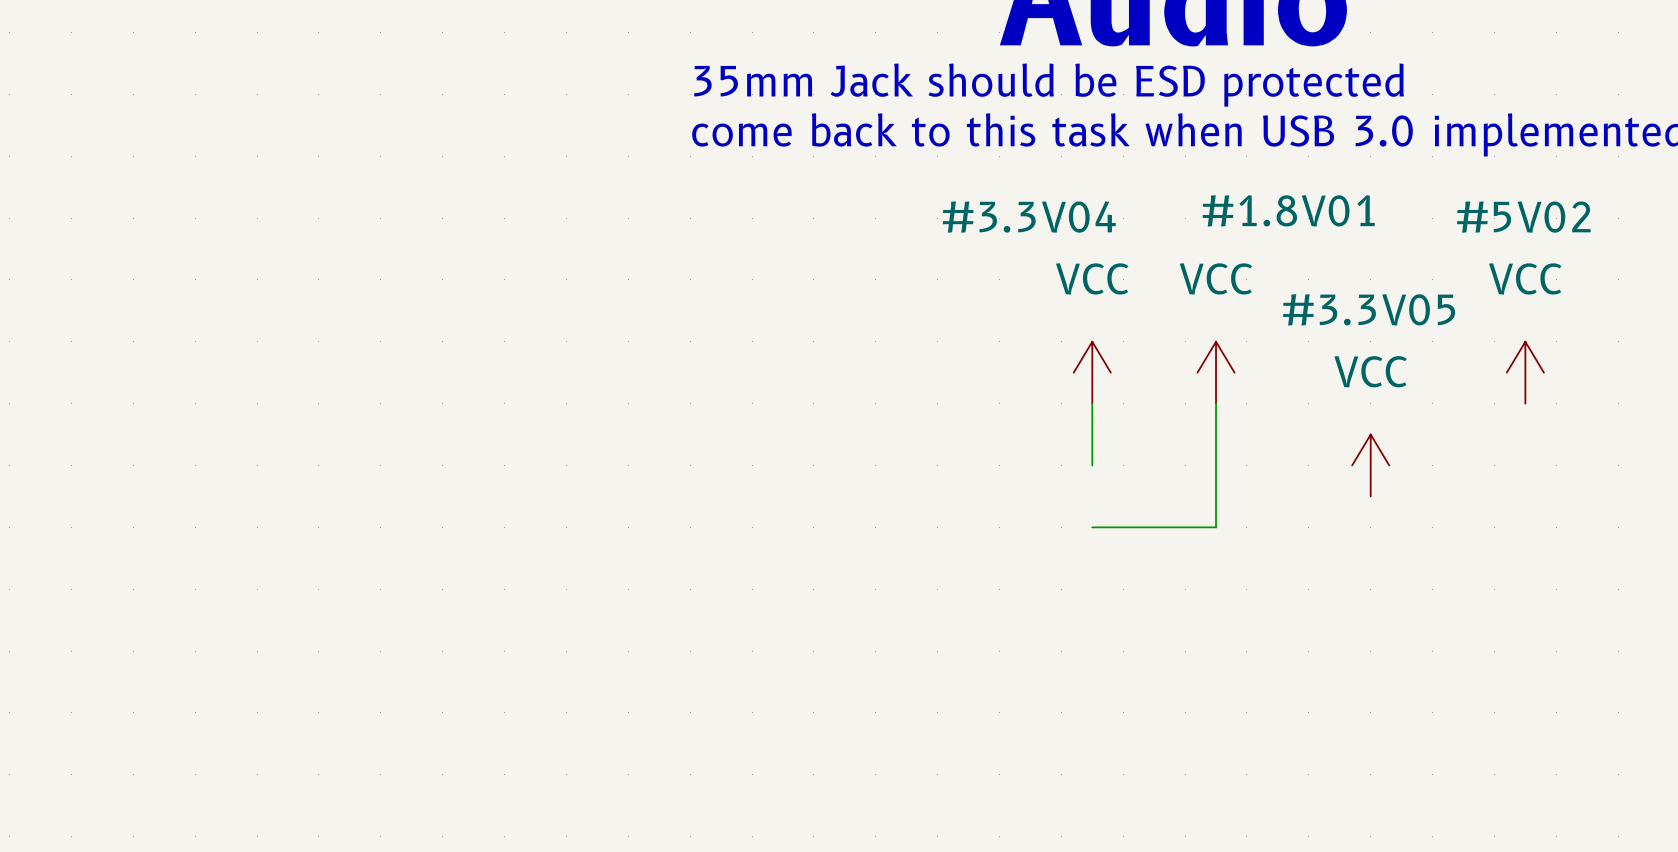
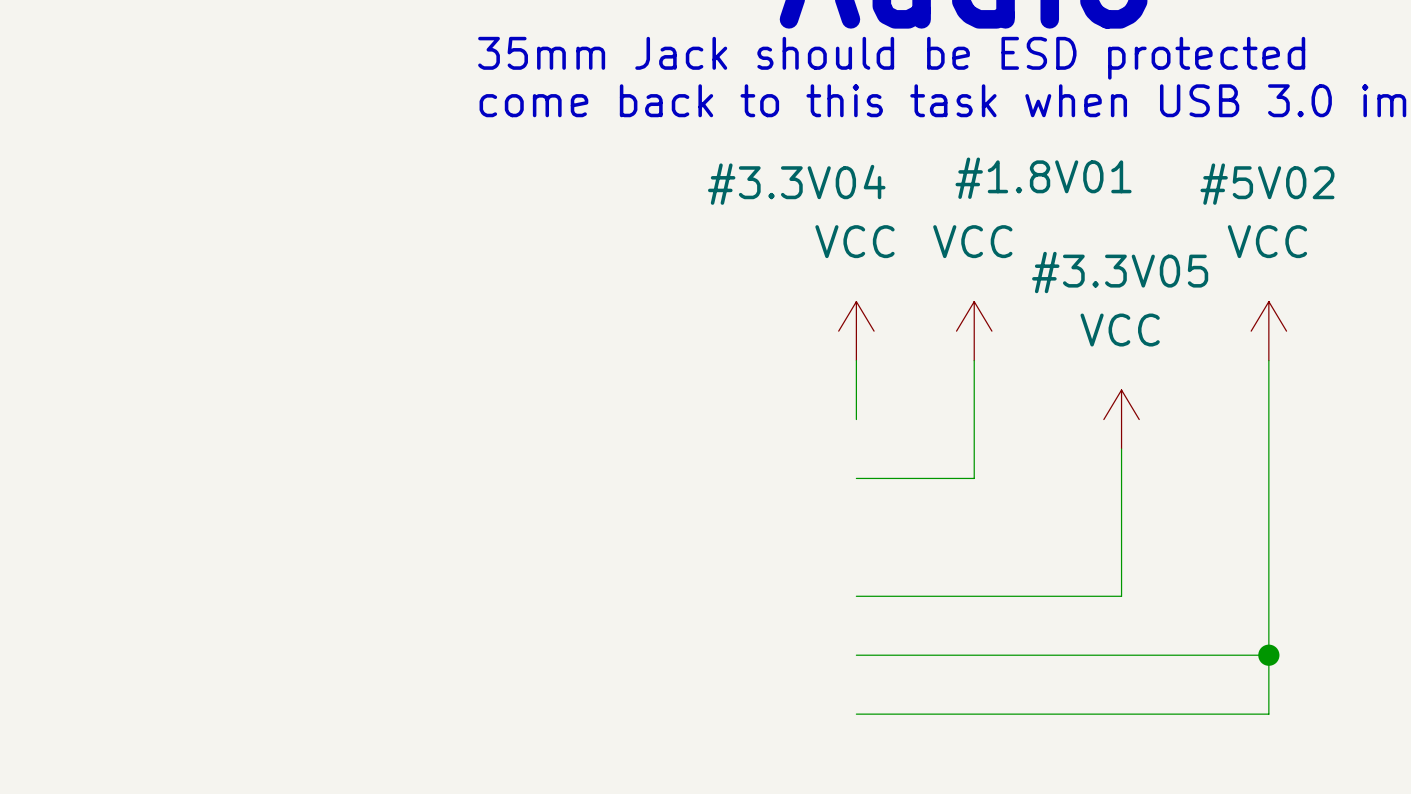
wire: none -> (1268, 360) (1268, 714) (856, 714)
wire: none -> (1121, 448) (1121, 596) (856, 596)
wire: none -> (856, 655) (1268, 655)
junction: none -> (1268, 655)

